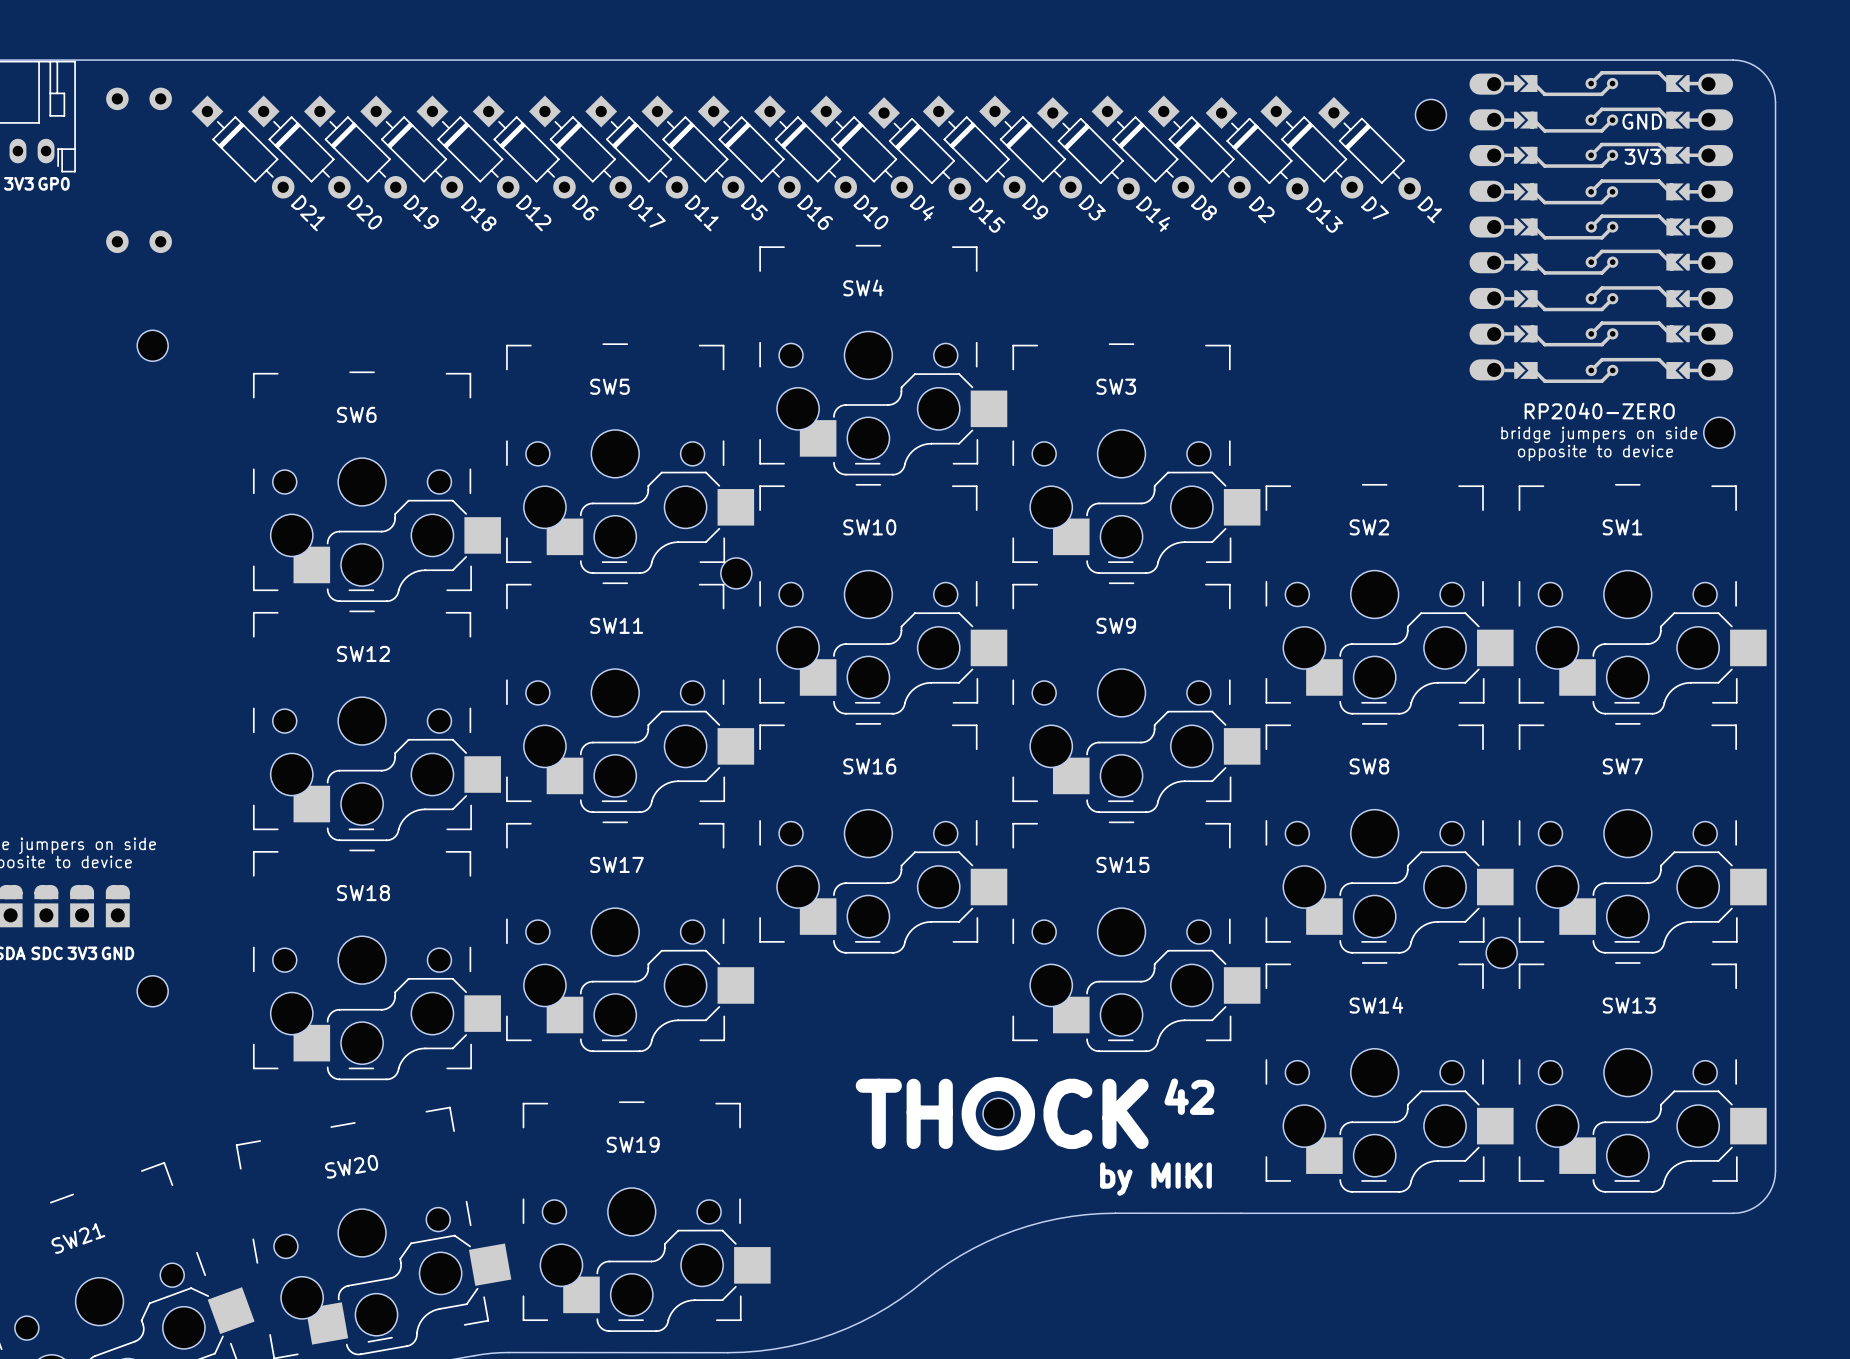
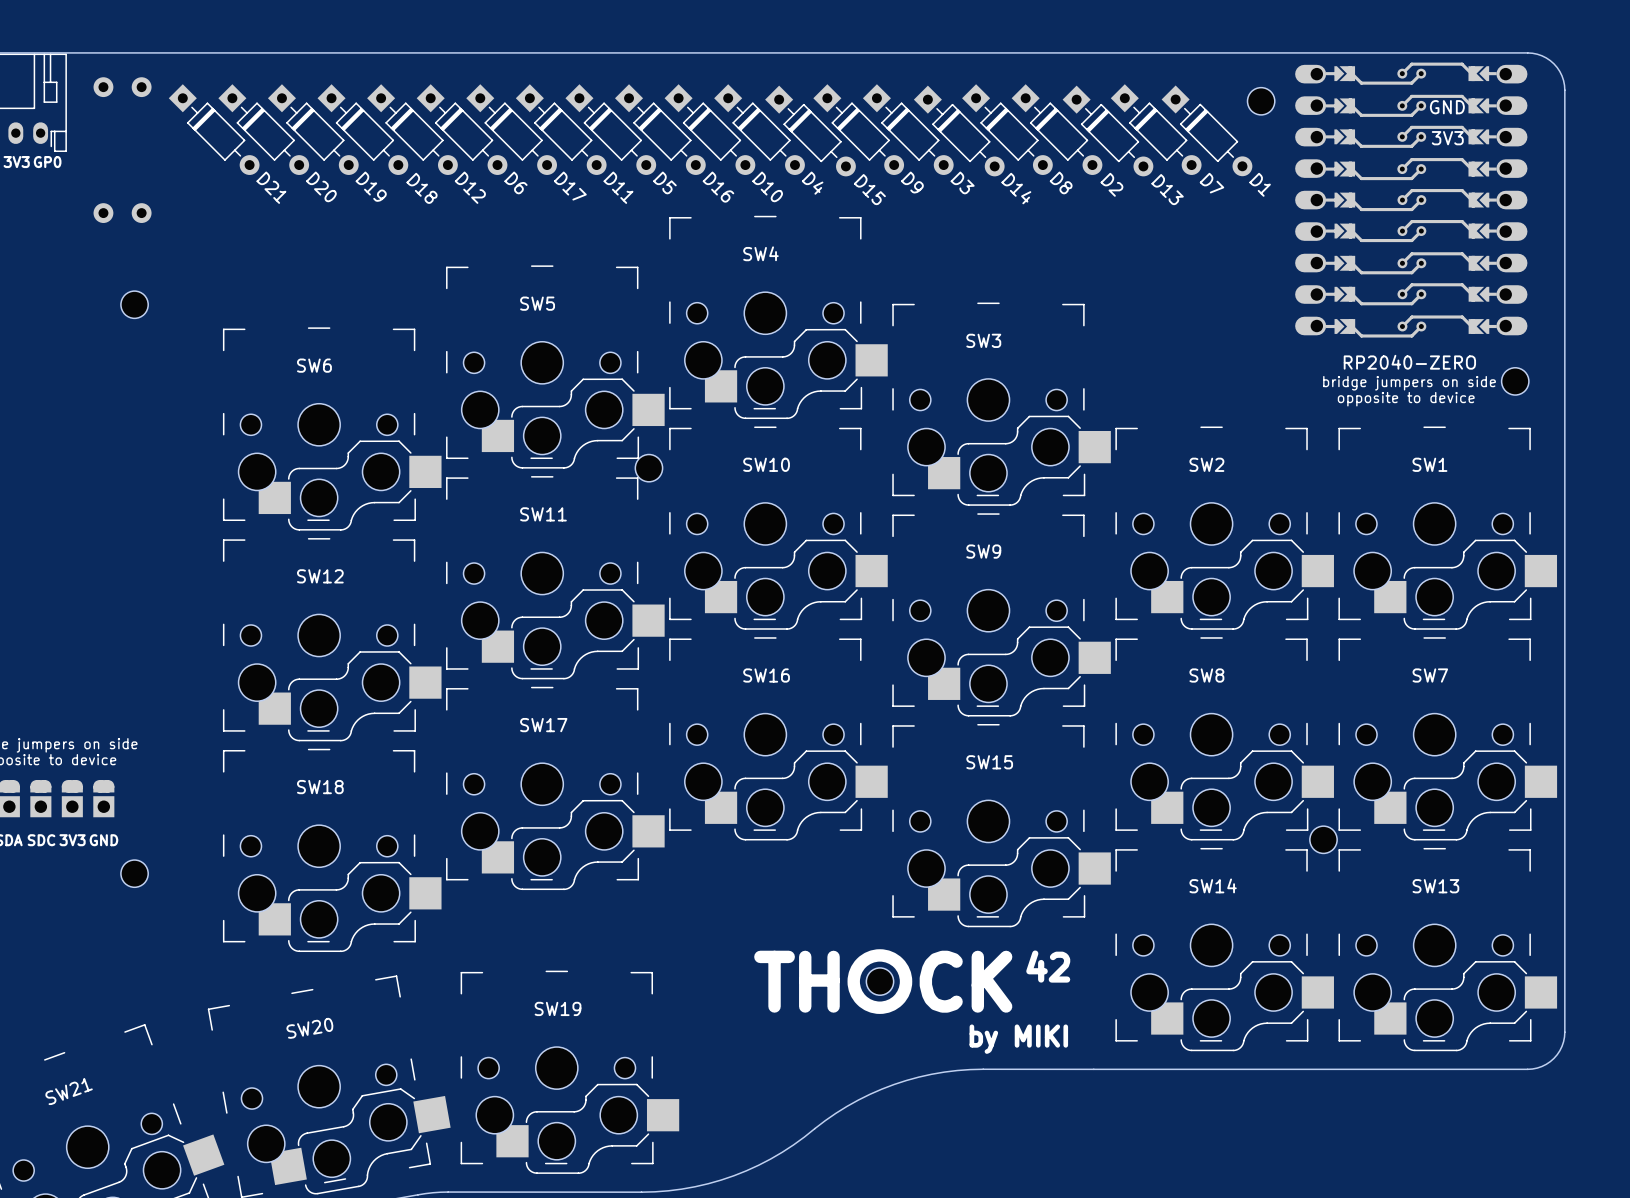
SW5 position: (630, 458) -> (555, 367)
part position: (736, 573) -> (648, 468)
SW11 position: (630, 697) -> (555, 577)
SW17 position: (630, 936) -> (555, 788)

